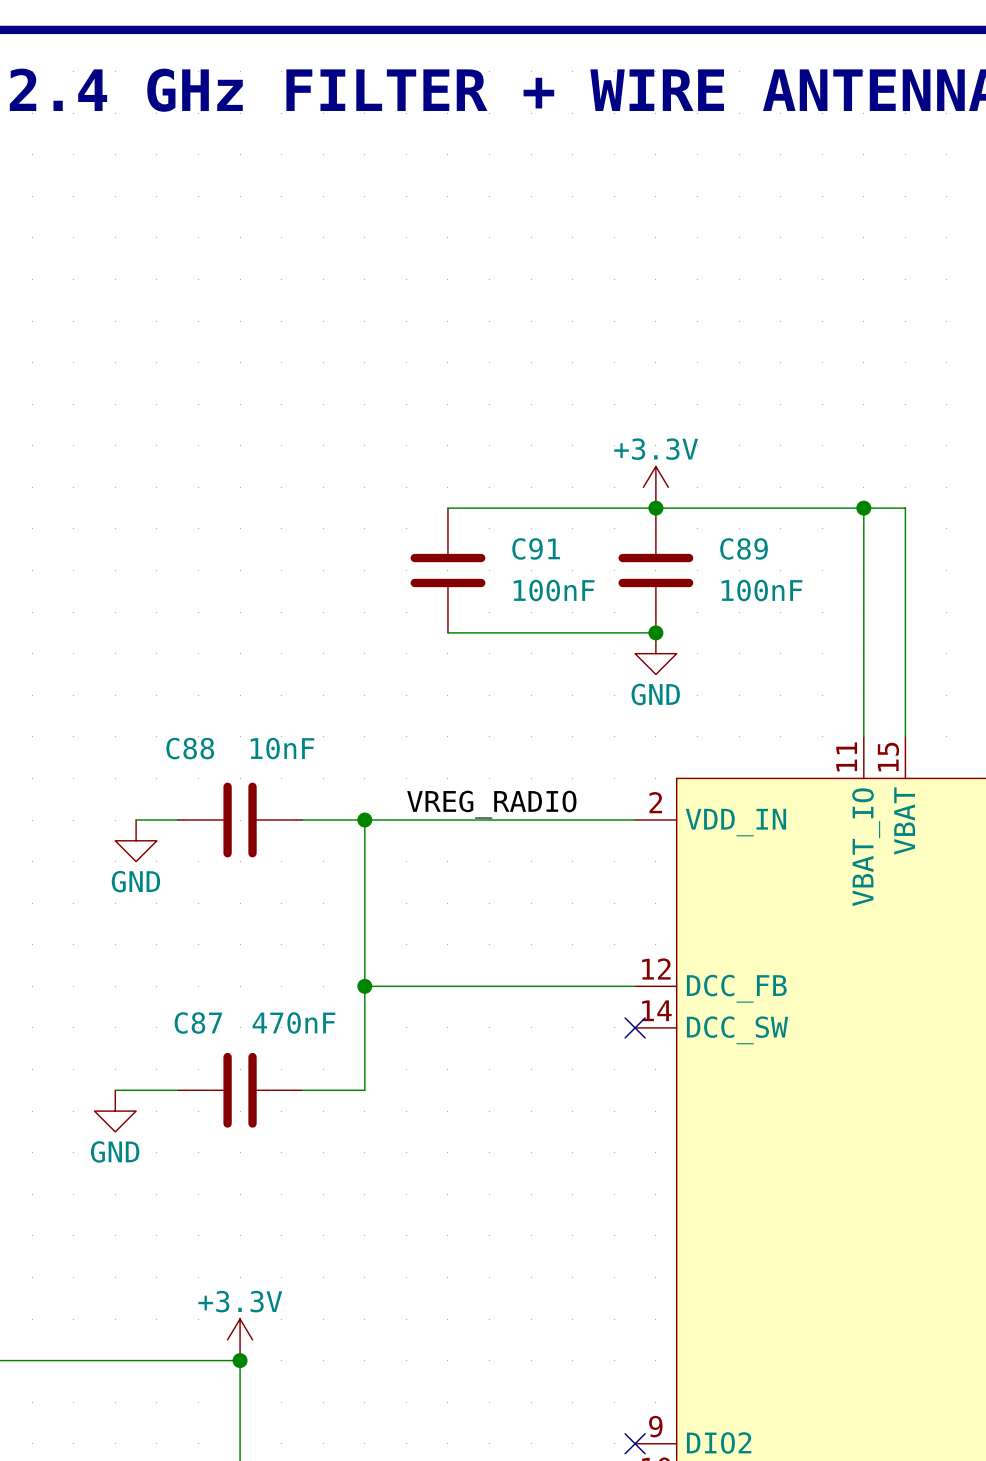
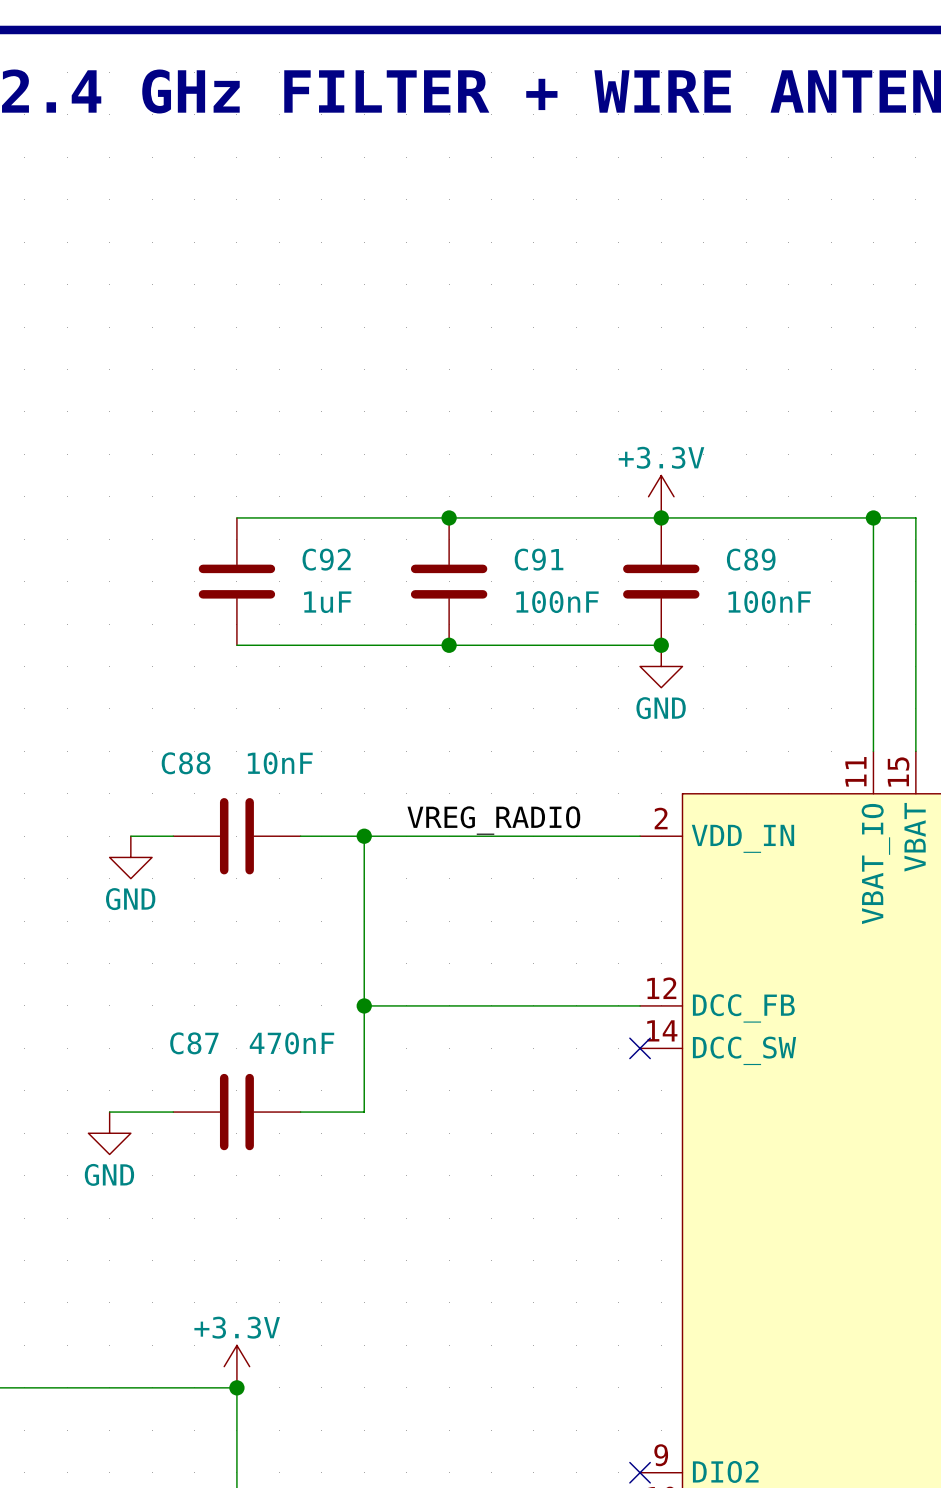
wire: none -> (236, 517) (449, 517)
junction: none -> (449, 517)
C92: none -> 1uF (236, 581)
wire: none -> (236, 645) (449, 645)
junction: none -> (449, 645)

